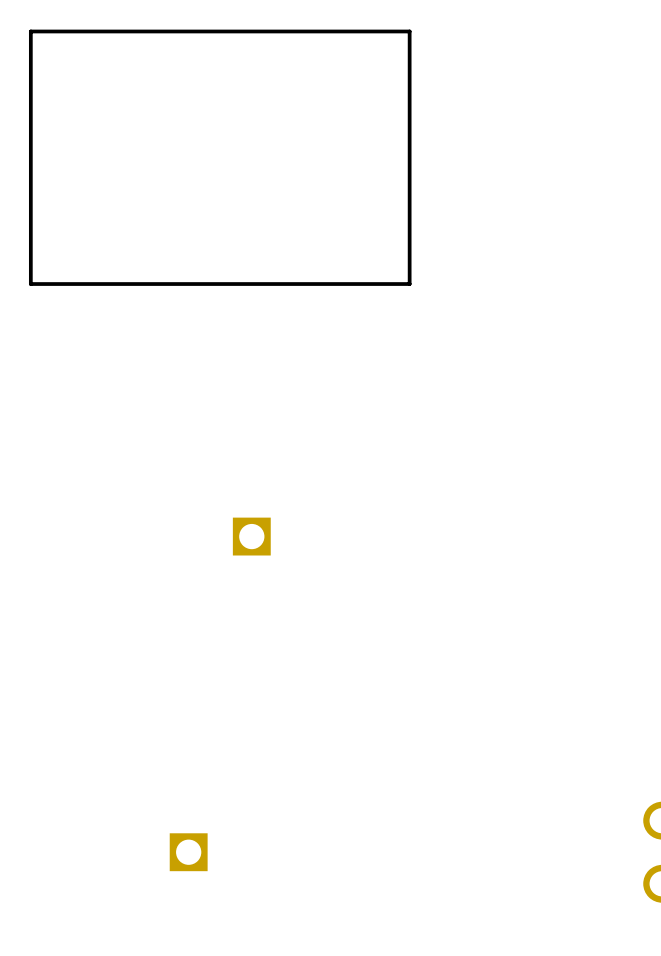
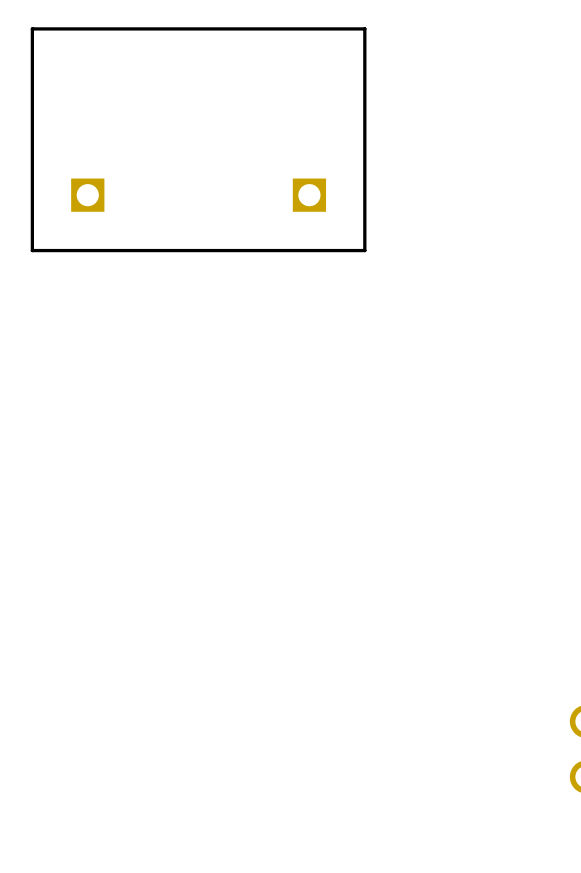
part: none -> (87, 195)
part: none -> (309, 195)
part: (251, 536) -> none
part: (188, 852) -> none

